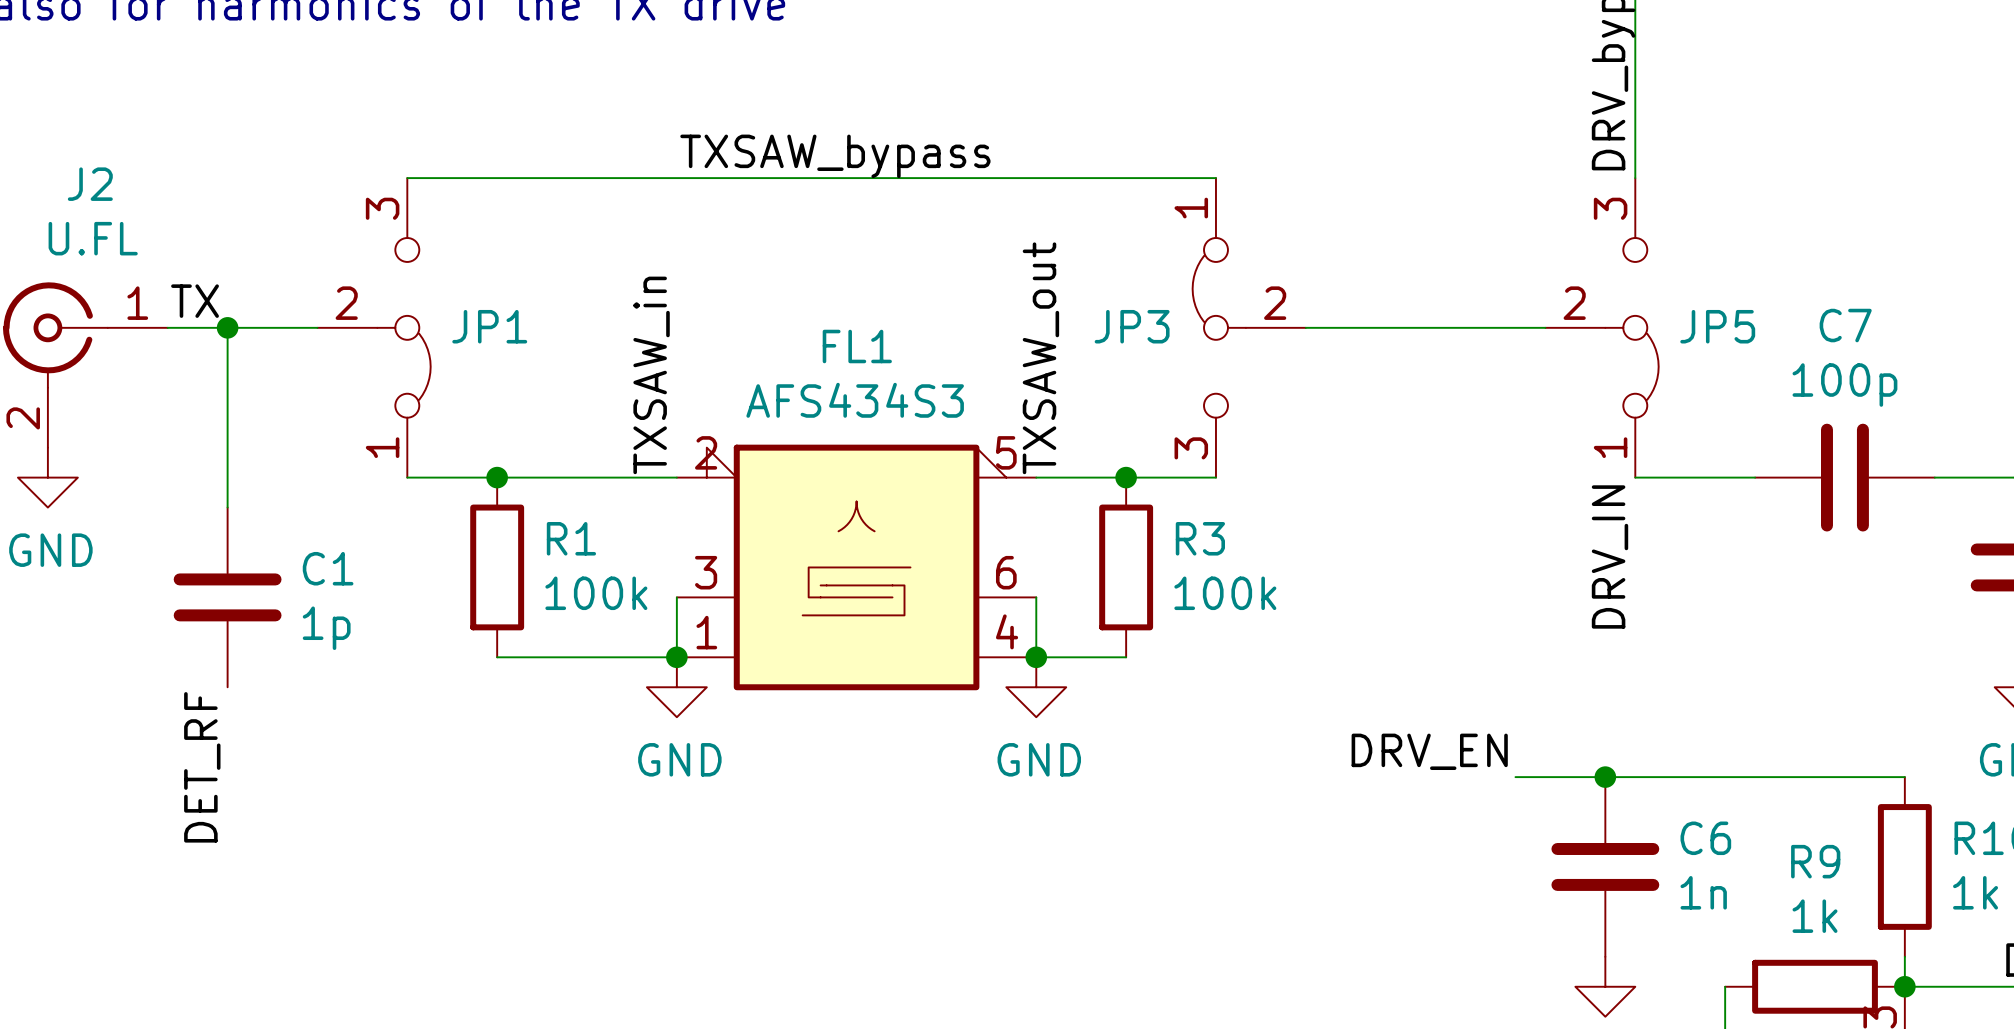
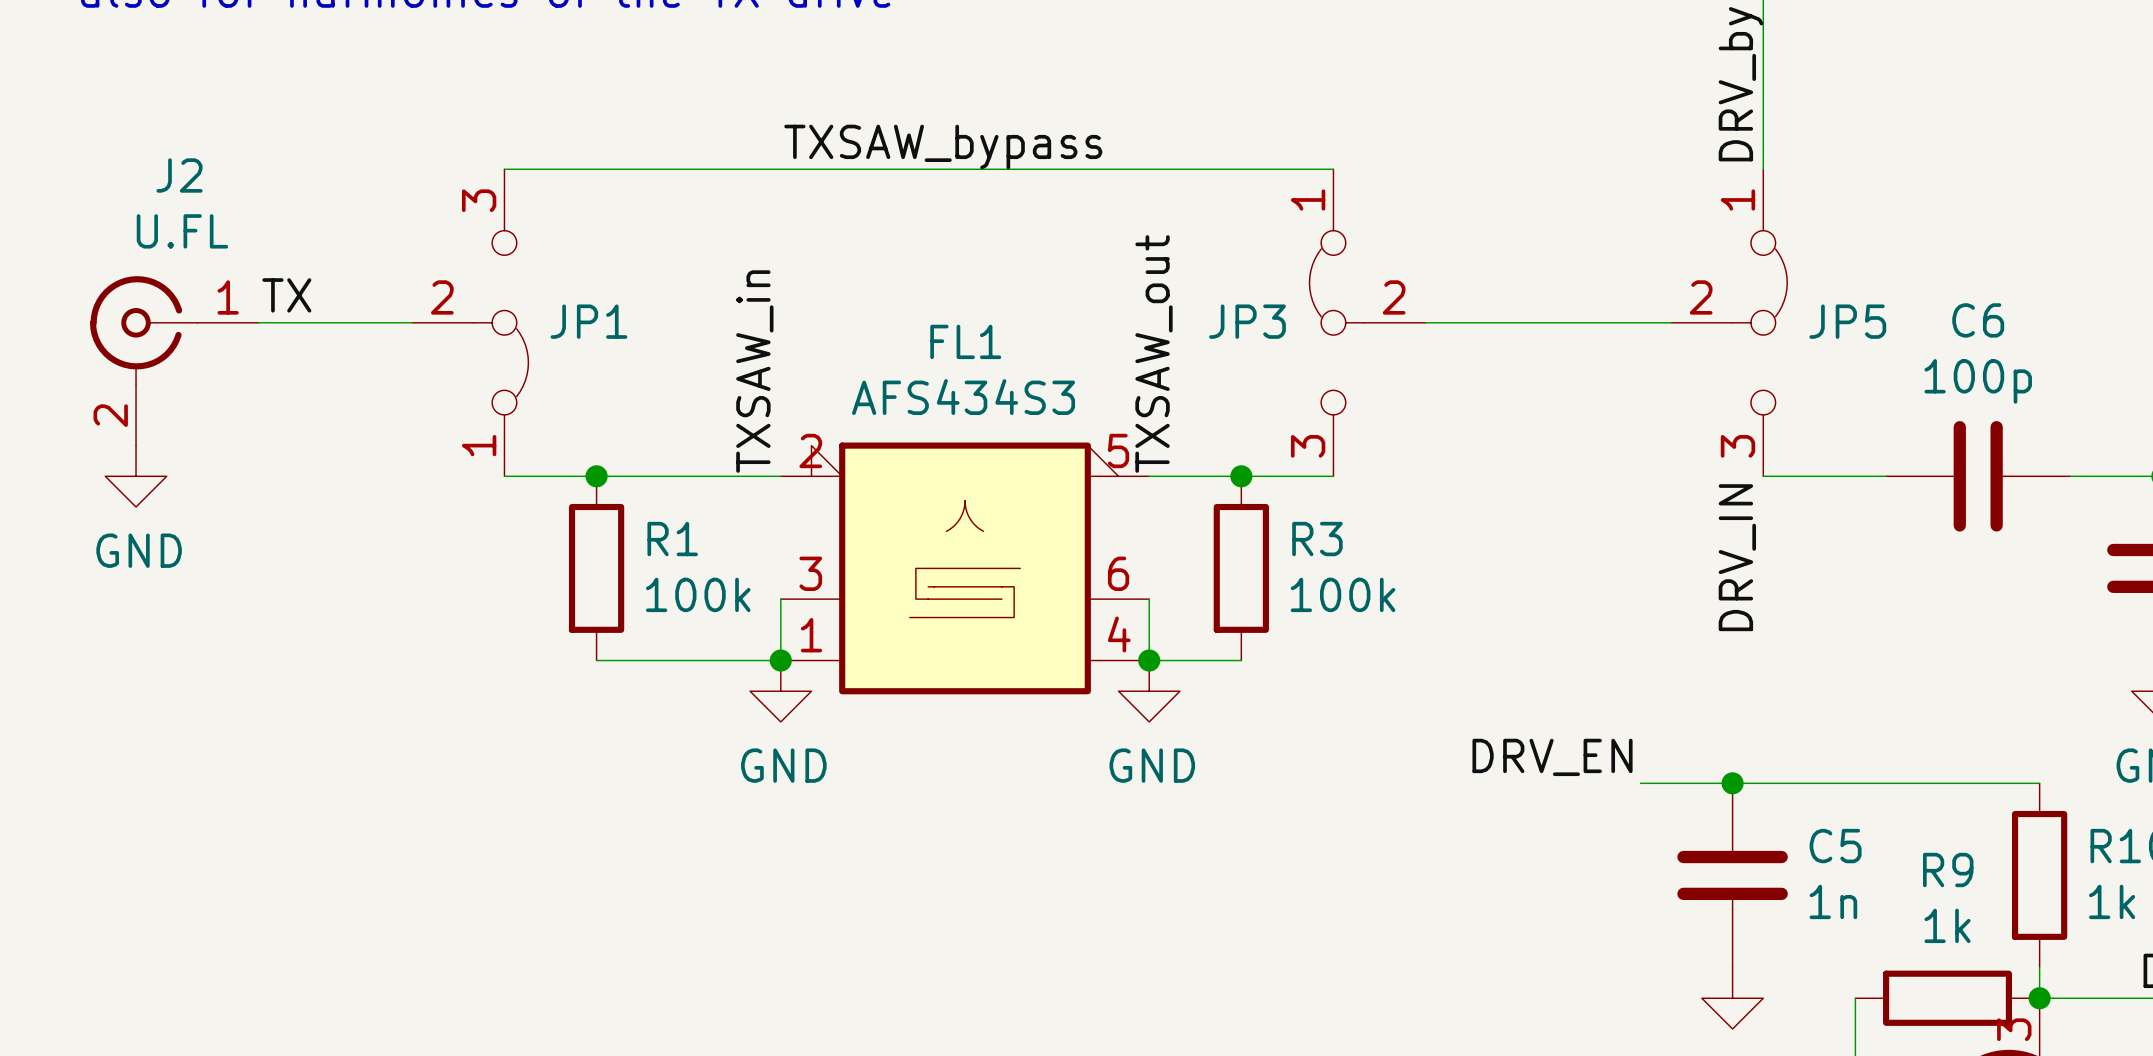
C7 name: C7 (1845, 325) -> C6 (1978, 320)
wire: (227, 327) (227, 507) -> none
junction: (227, 327) -> none
JP5 flip: as is (1632, 327) -> up-down (1759, 322)
C1: 1p (227, 597) -> none
label: DET_RF (202, 767) -> none
C6 name: C6 (1705, 838) -> C5 (1835, 846)

